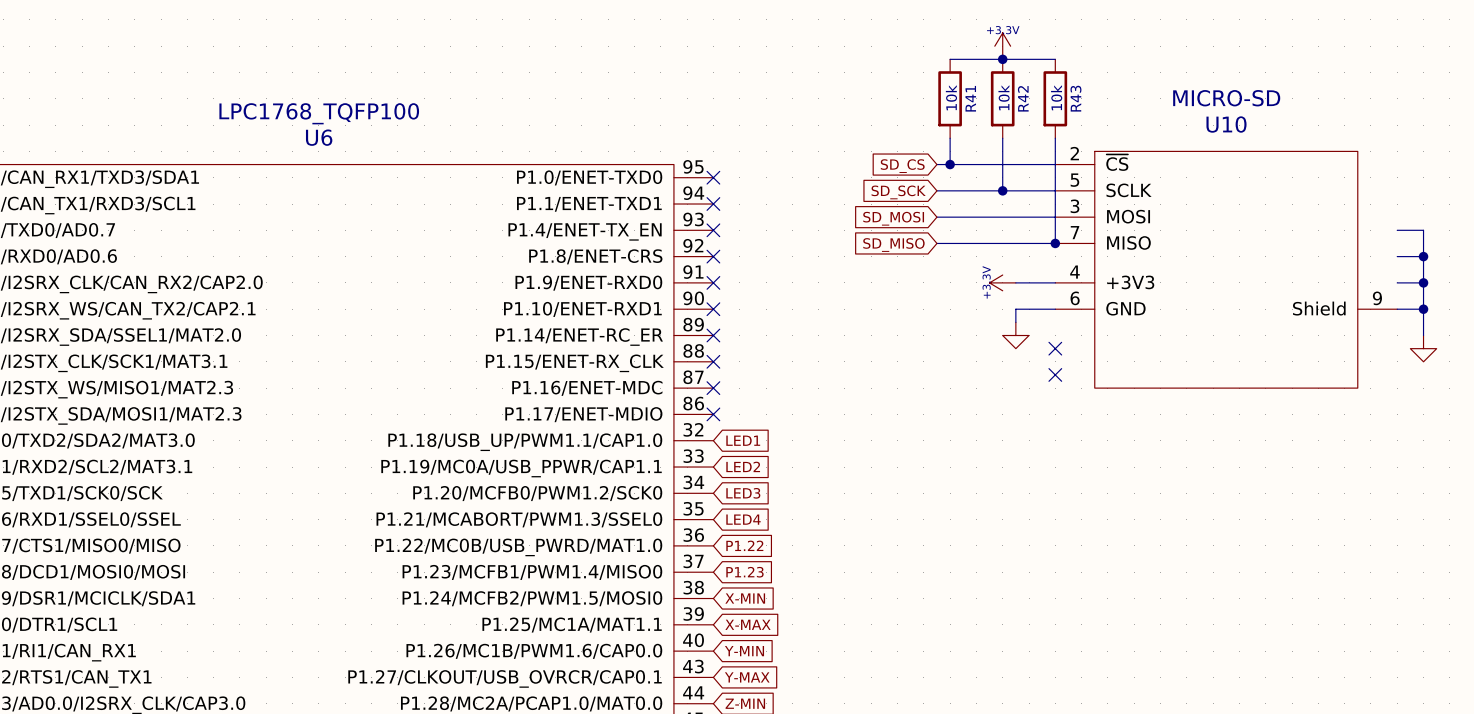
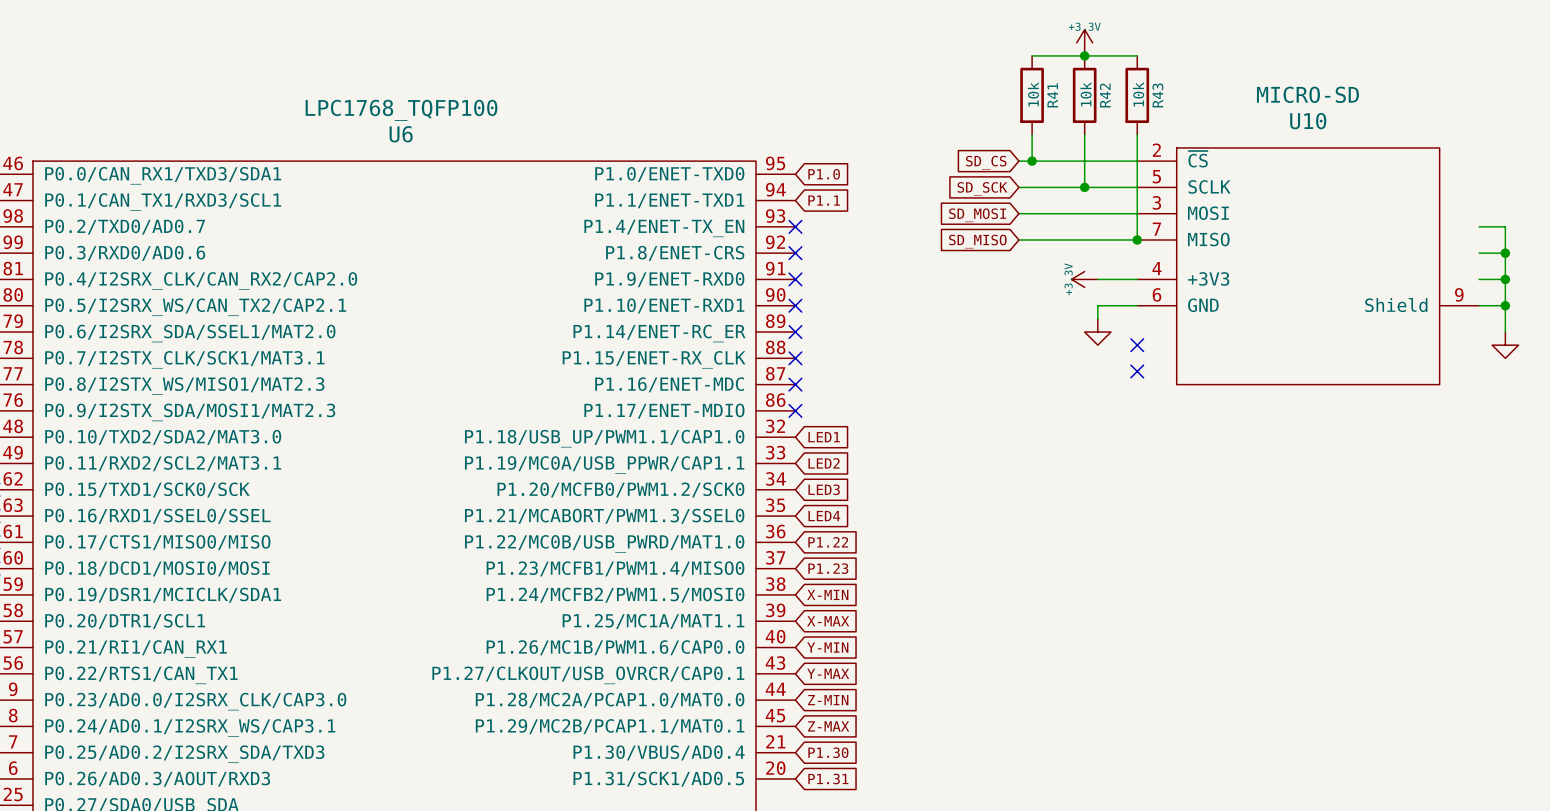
no-connect mark: (713, 177) -> none
global label: none -> P1.0 (824, 174)
no-connect mark: (713, 204) -> none
global label: none -> P1.1 (824, 200)

